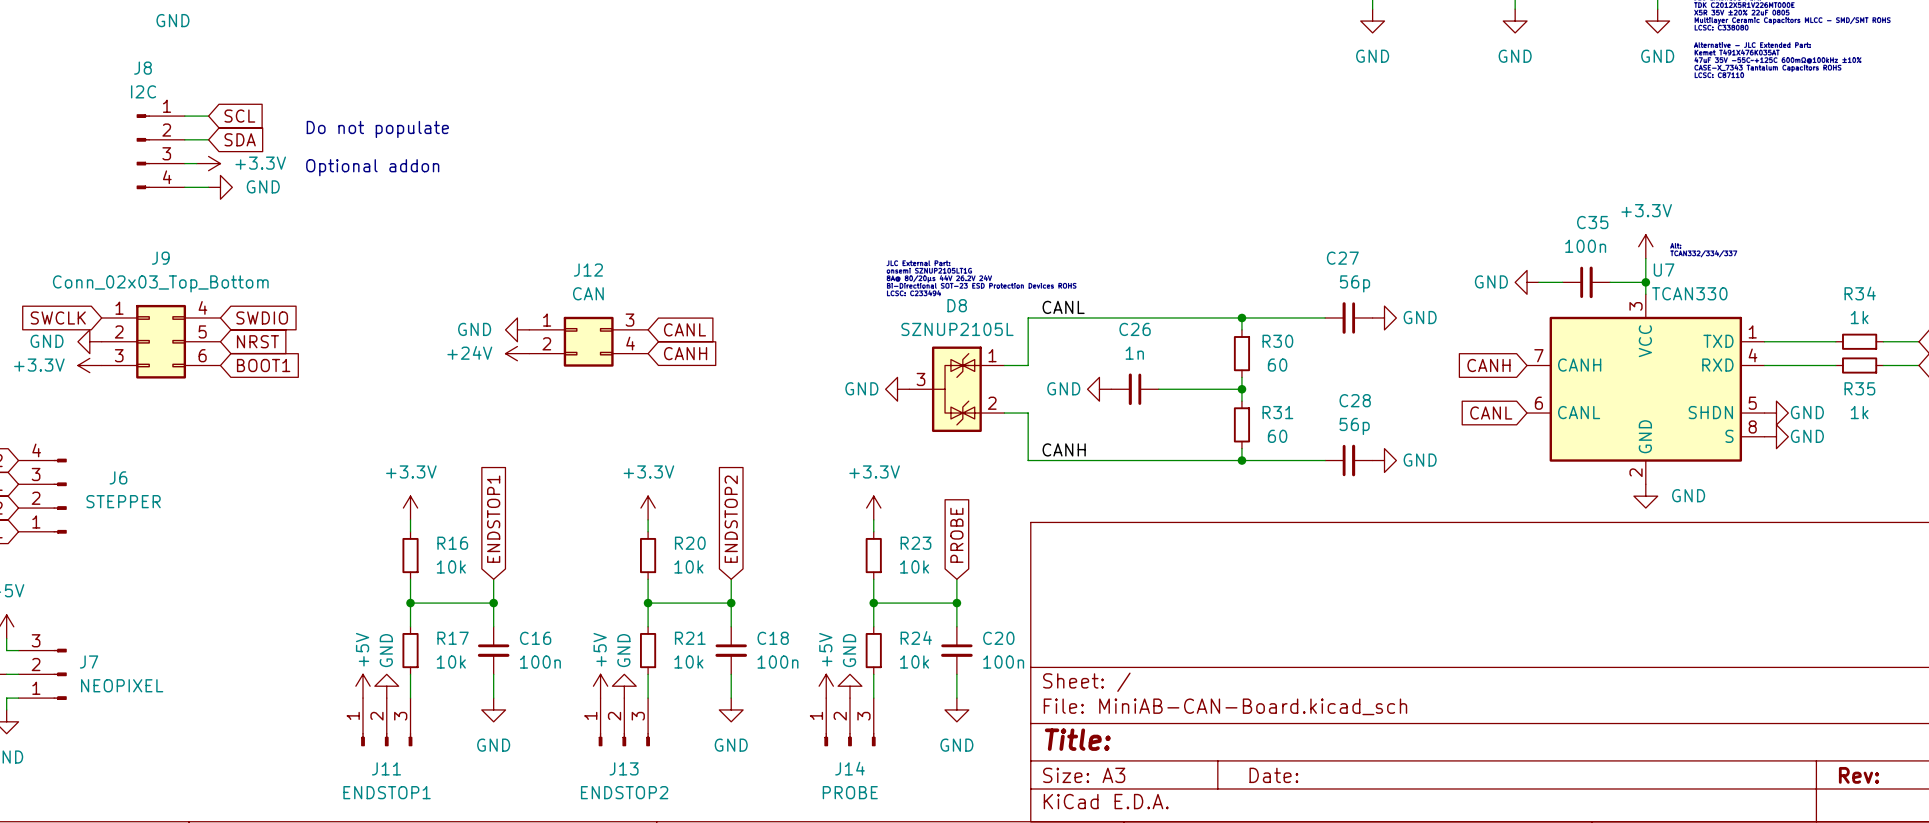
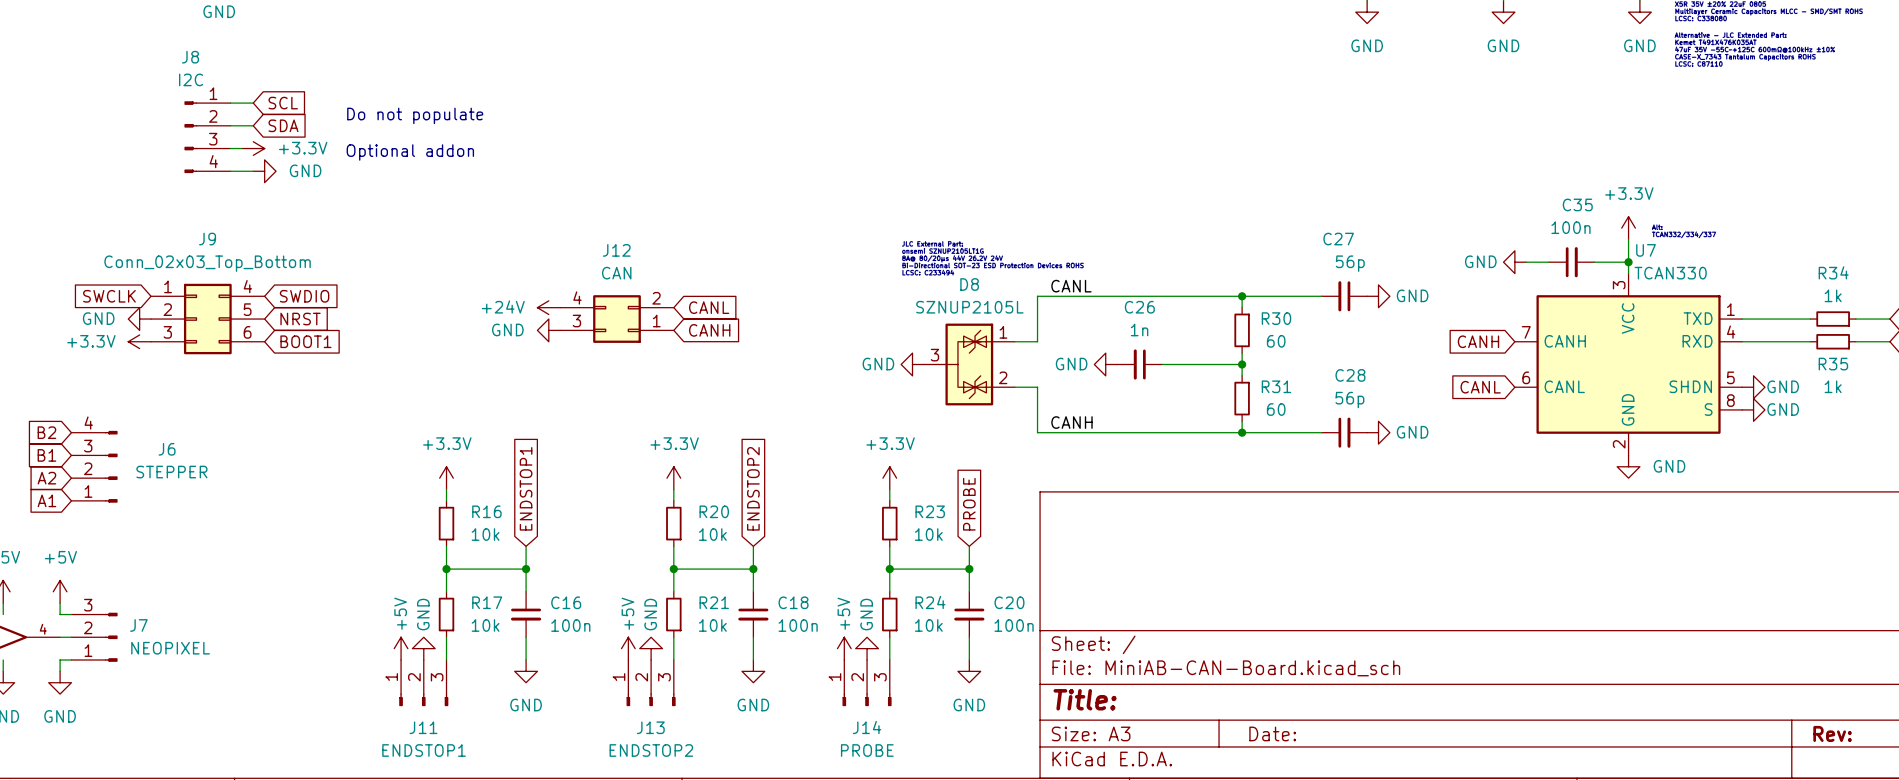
power symbol: GND (517, 329) -> +24V (548, 307)
J12 rotation: 0° (588, 341) -> 180° (616, 319)
power symbol: +24V (517, 353) -> GND (548, 330)

